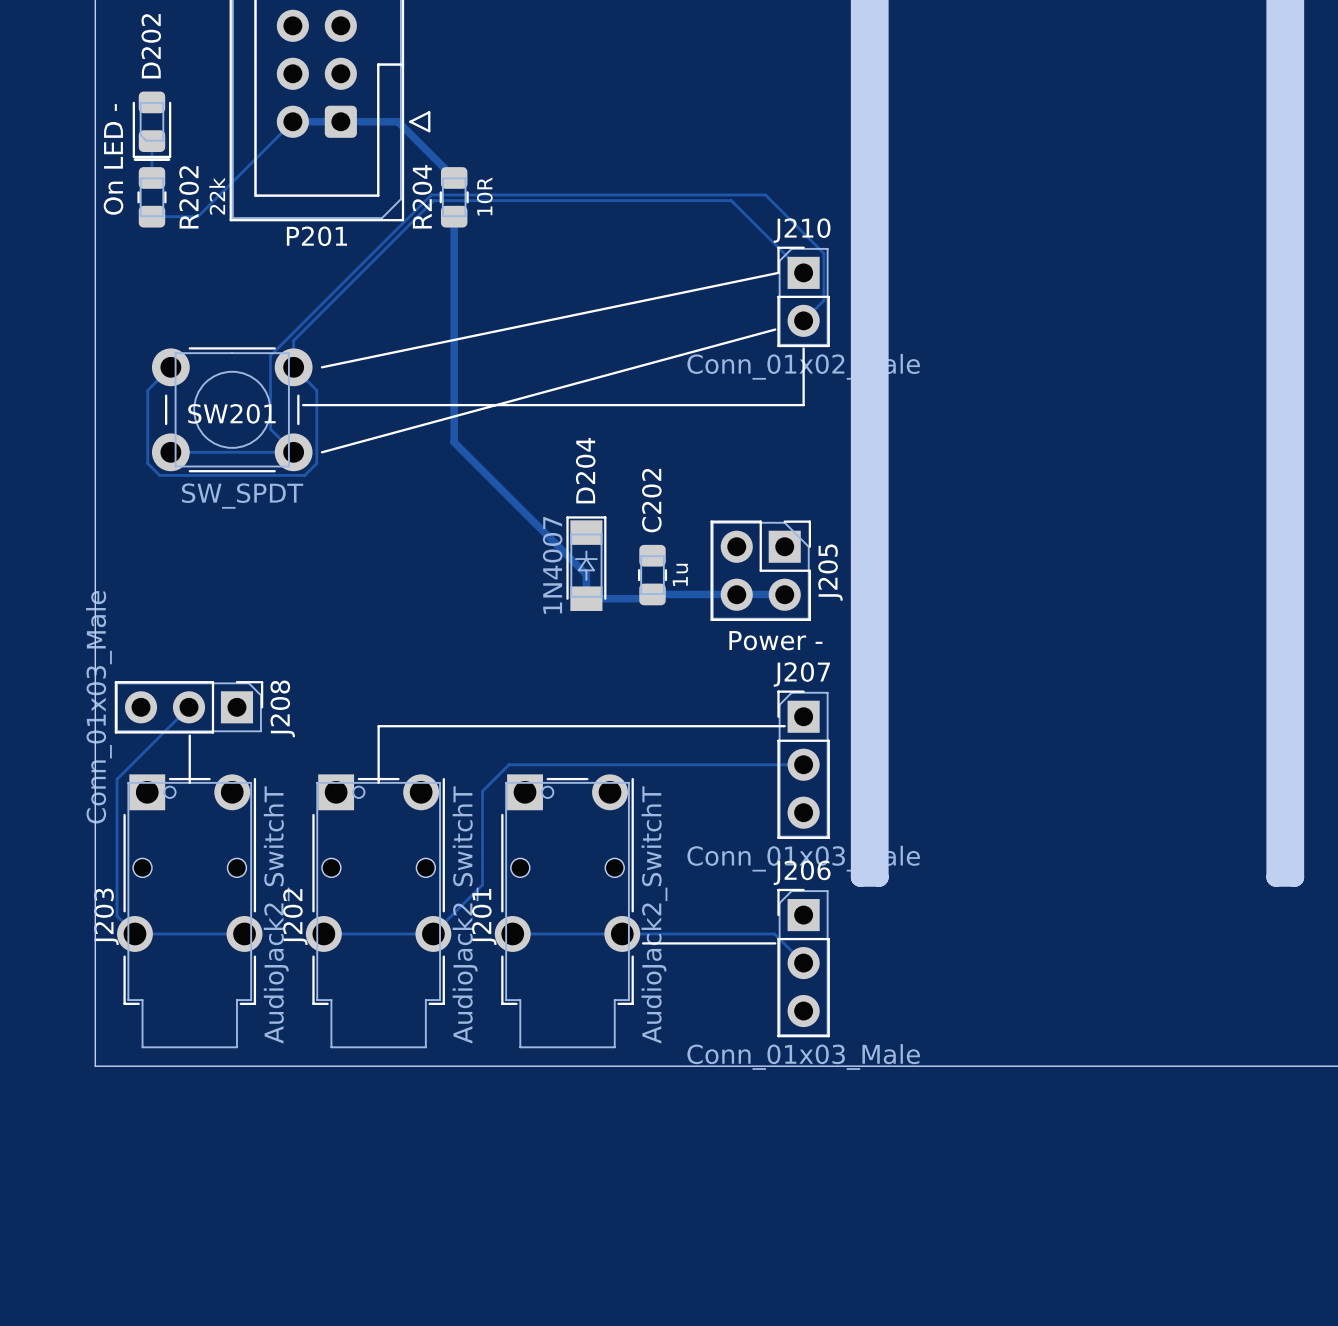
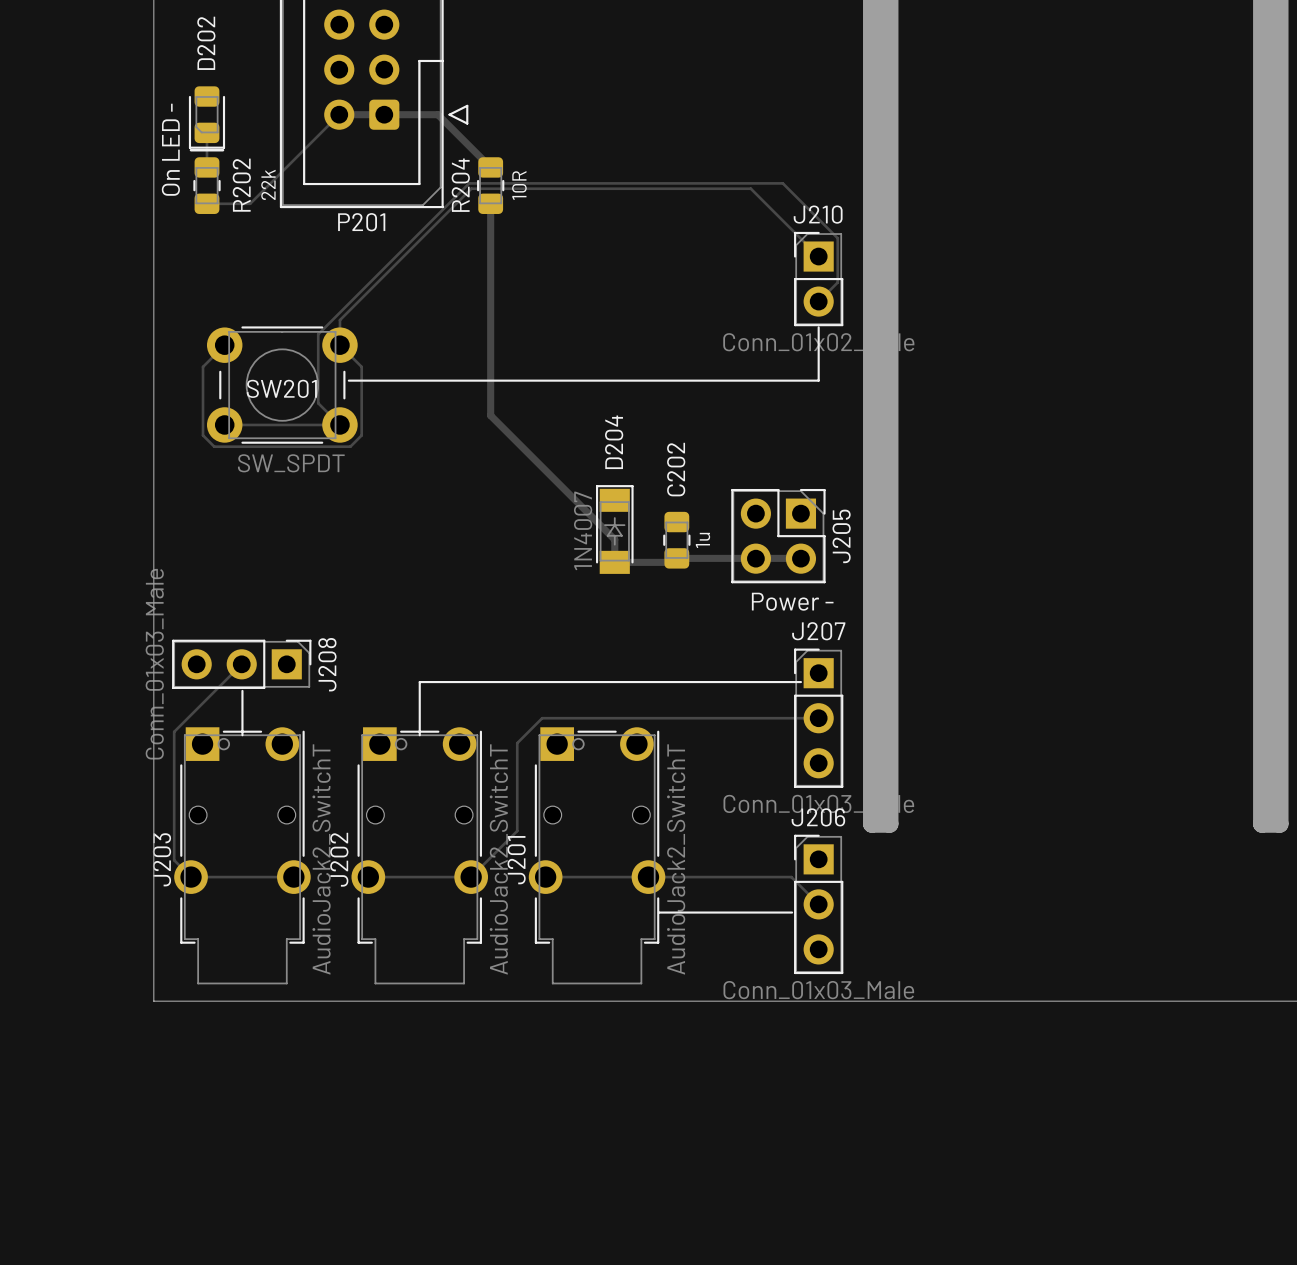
line: (778, 272) (321, 367) -> none
line: (775, 329) (321, 452) -> none
line: (643, 943) (775, 943) -> none
line: none -> (659, 912) (792, 912)

